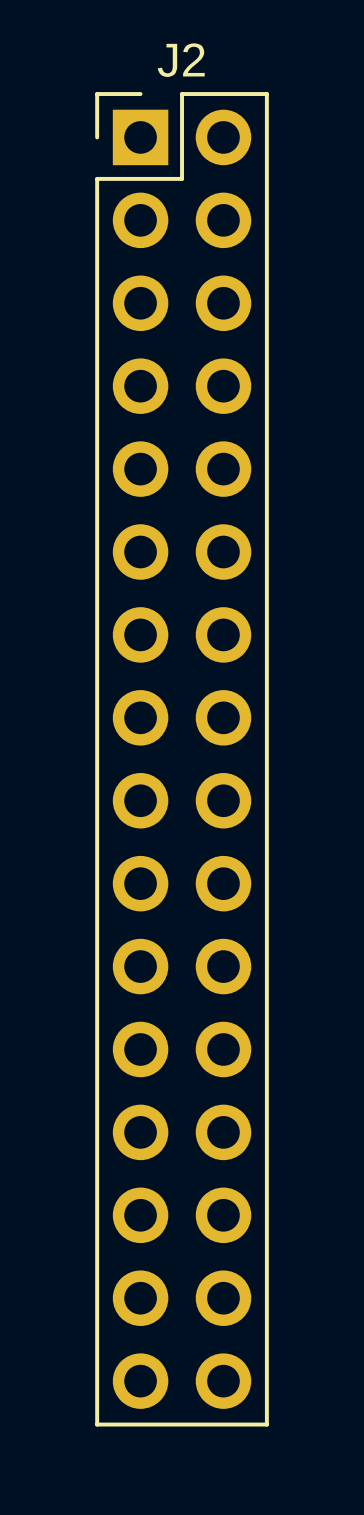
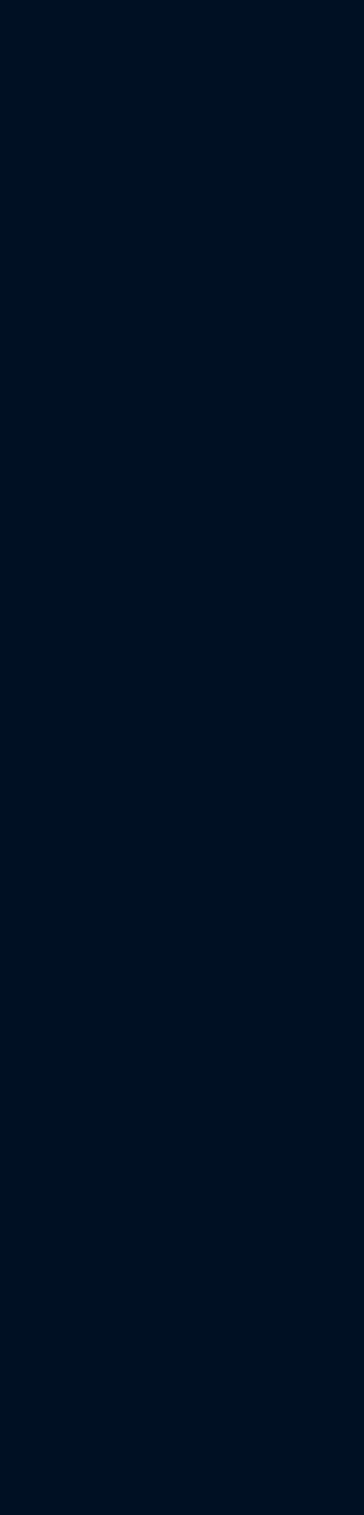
J2: (182, 759) -> none

